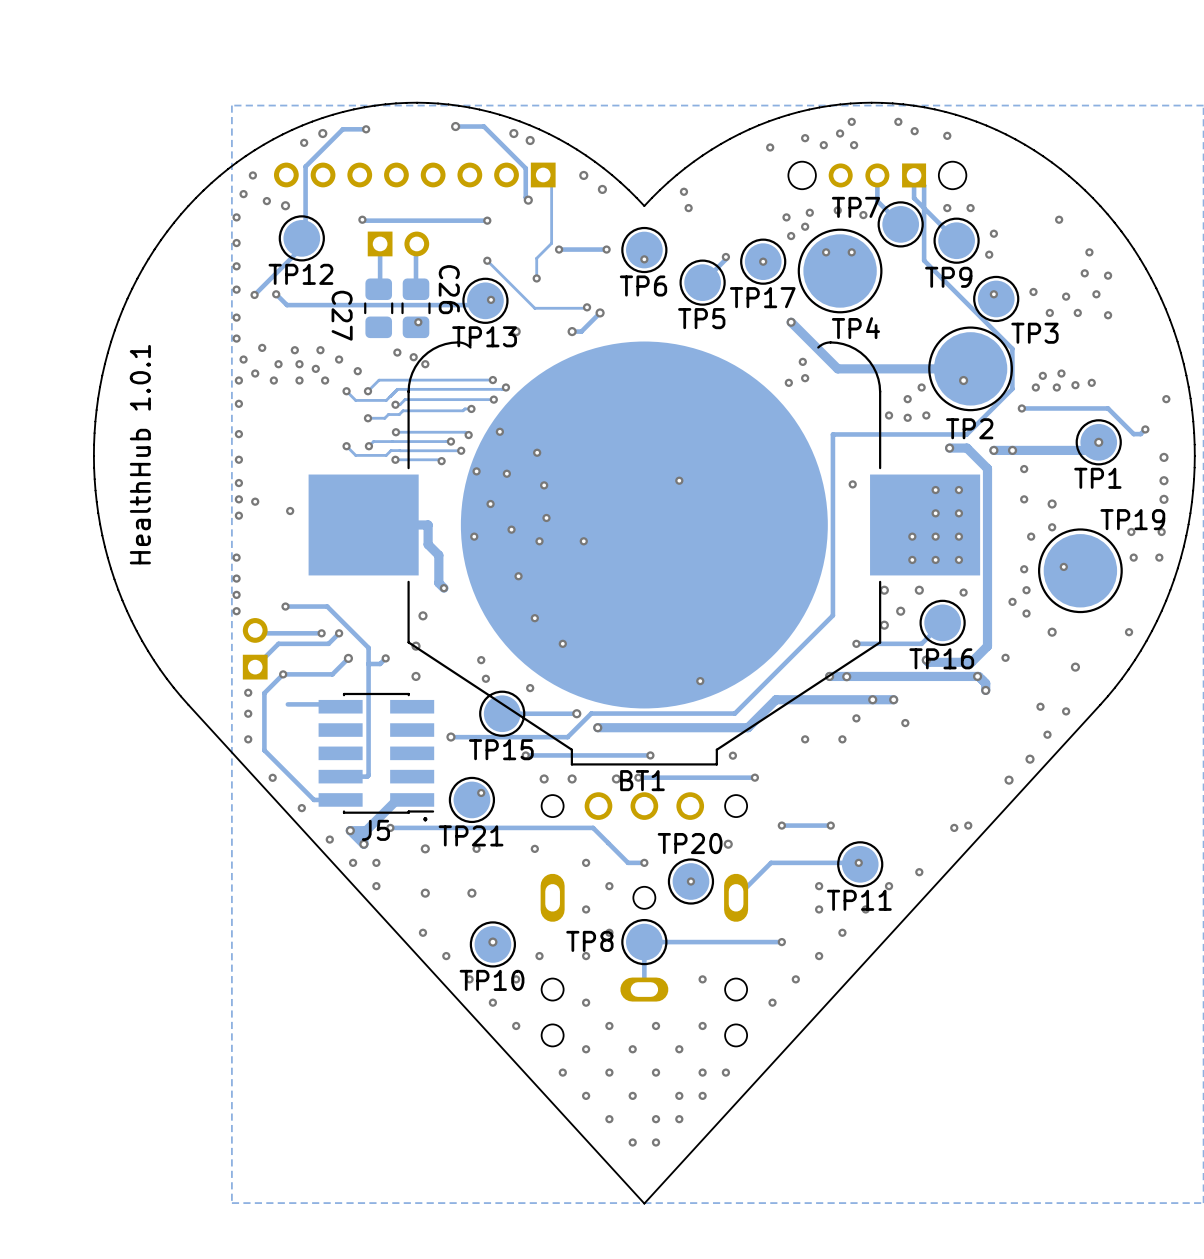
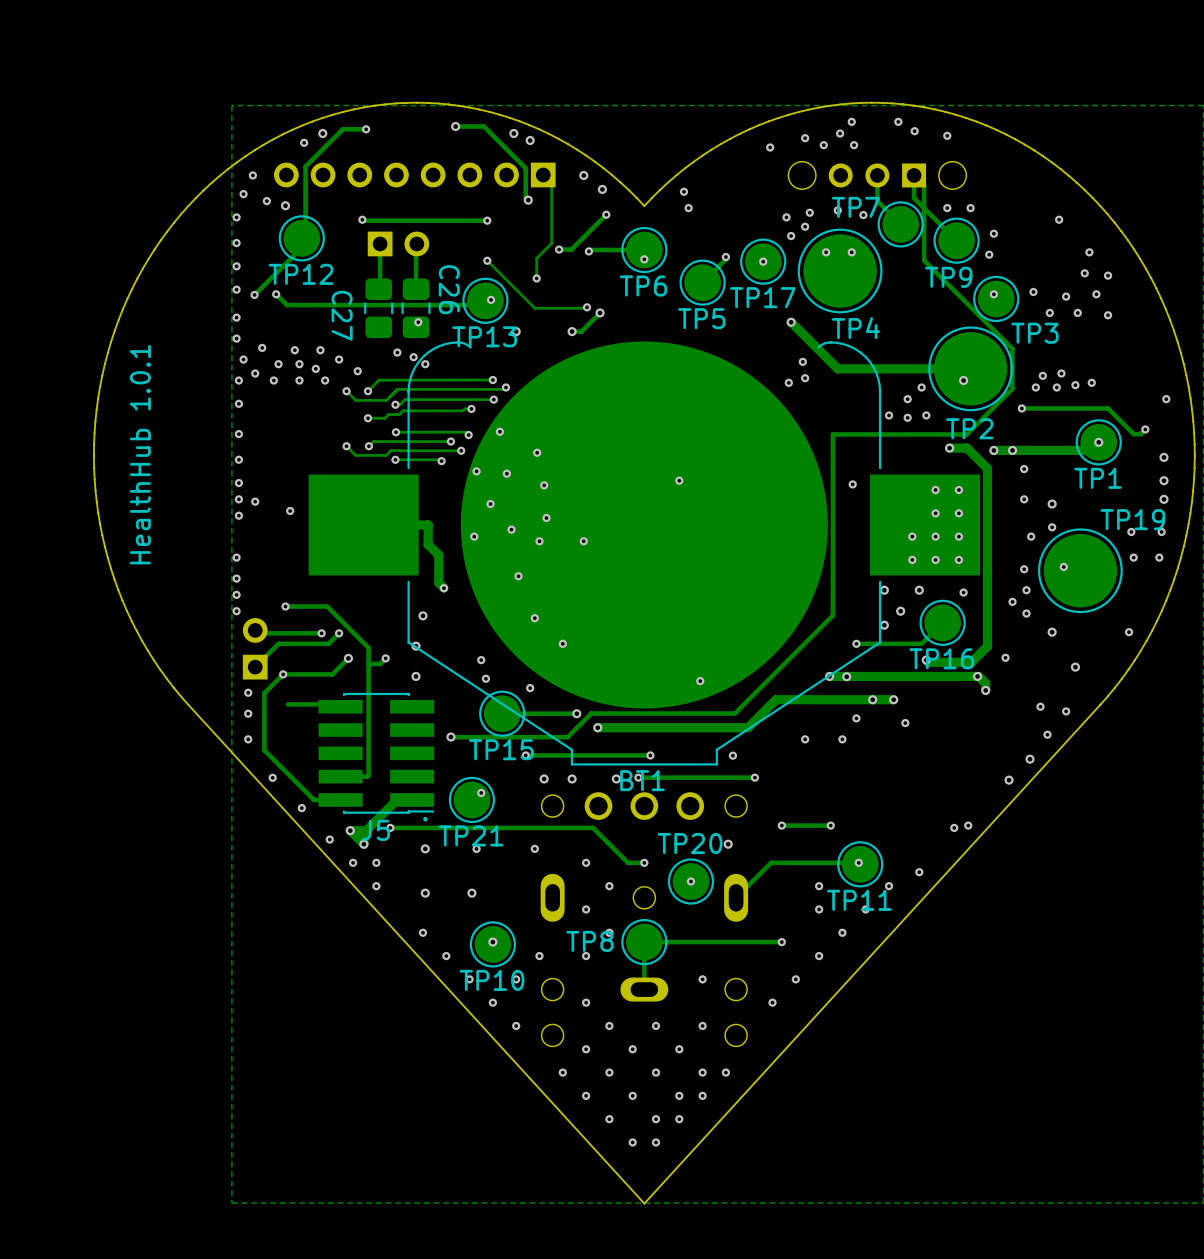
via: none -> (606, 214)
track: (606, 249) (571, 249) -> (606, 214) (571, 249)
via: (606, 249) -> none
track: none -> (644, 250) (588, 251)
via: none -> (588, 251)

